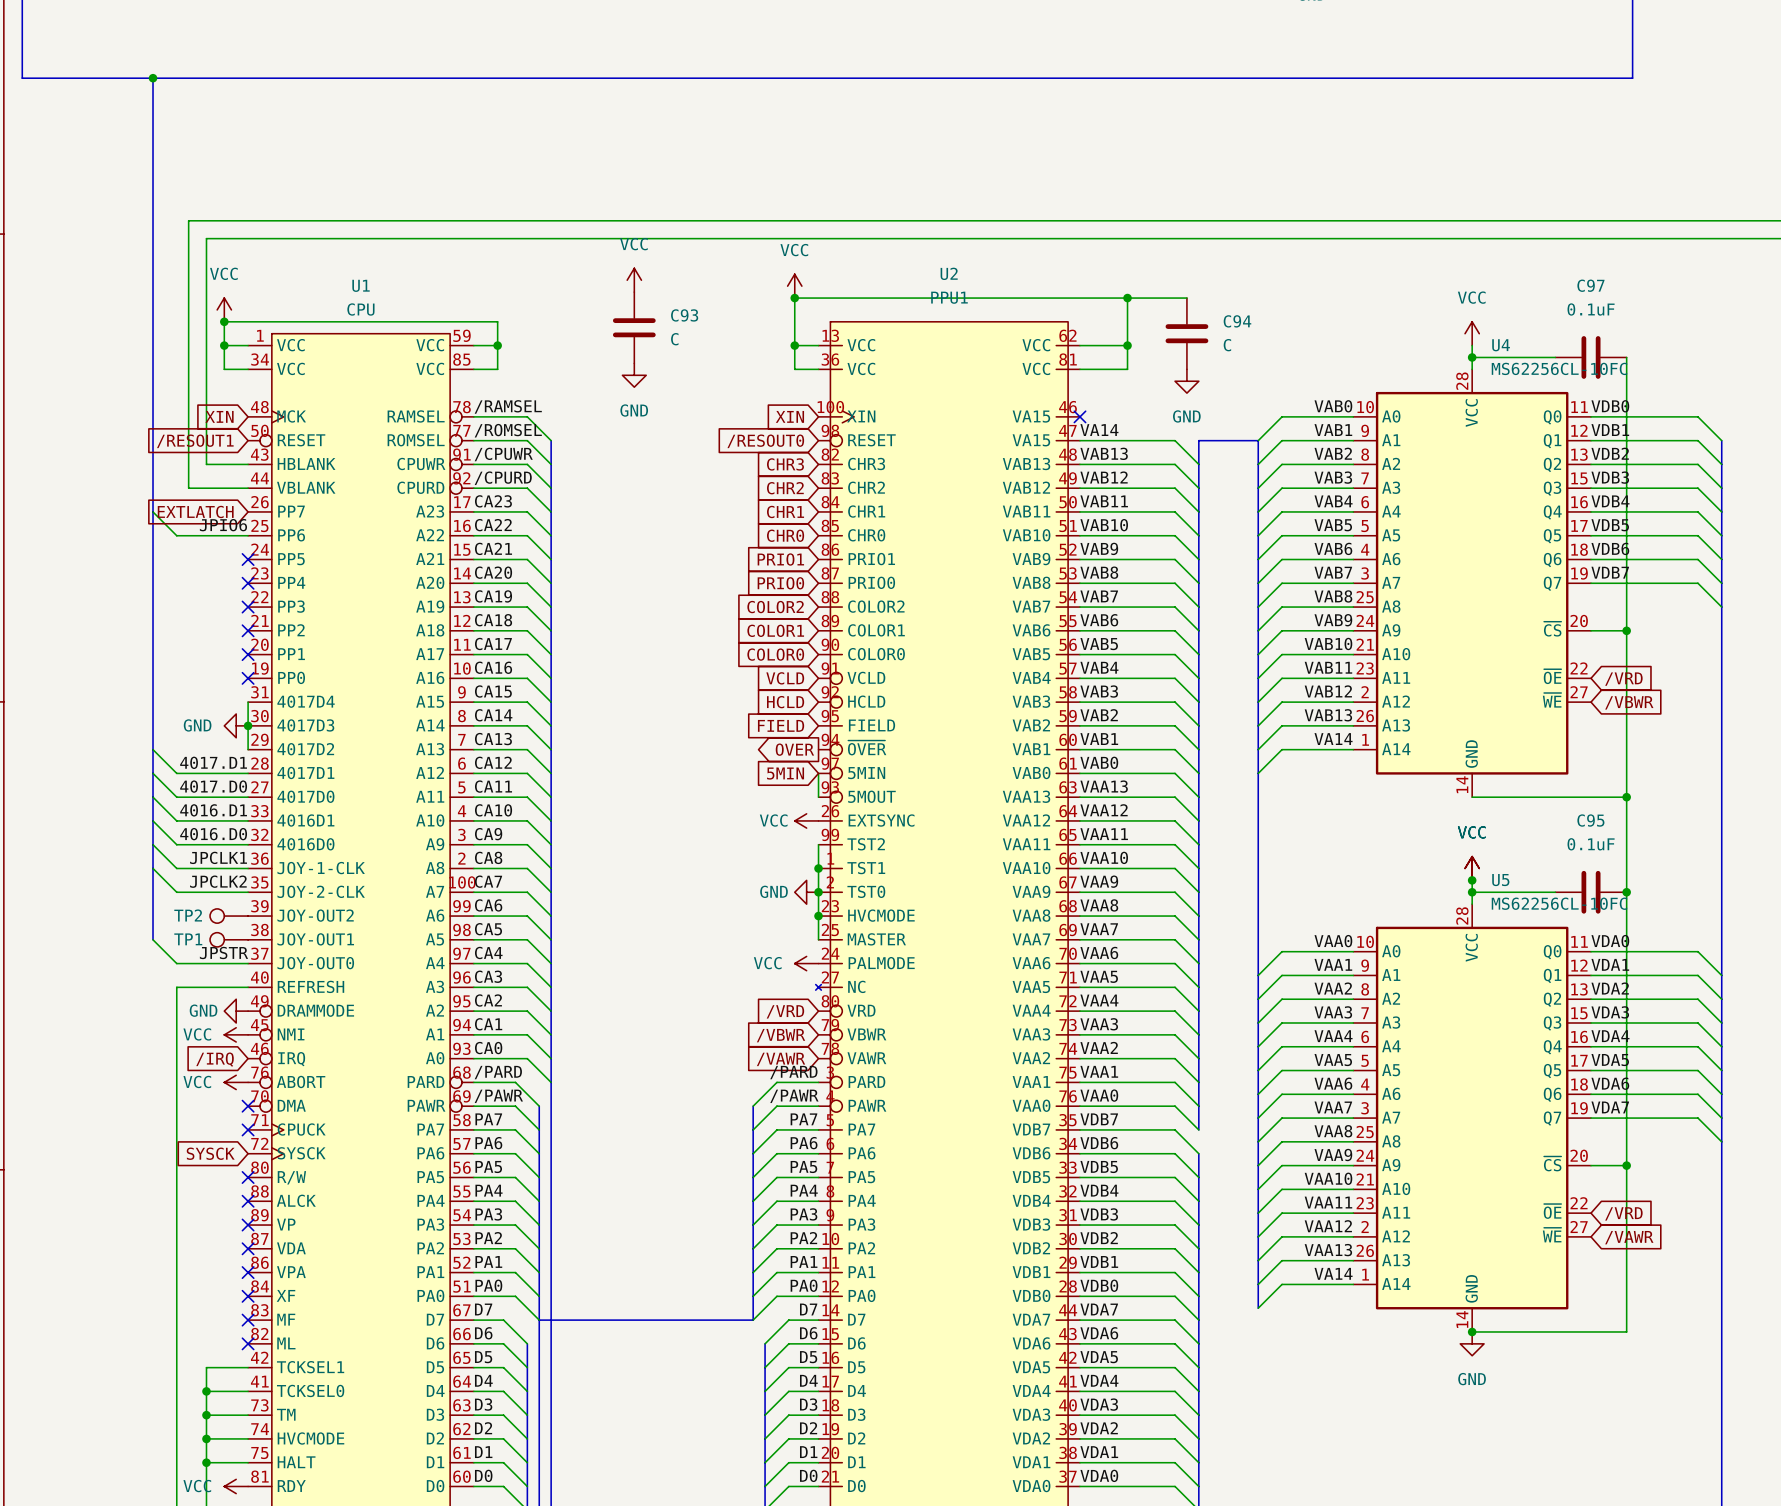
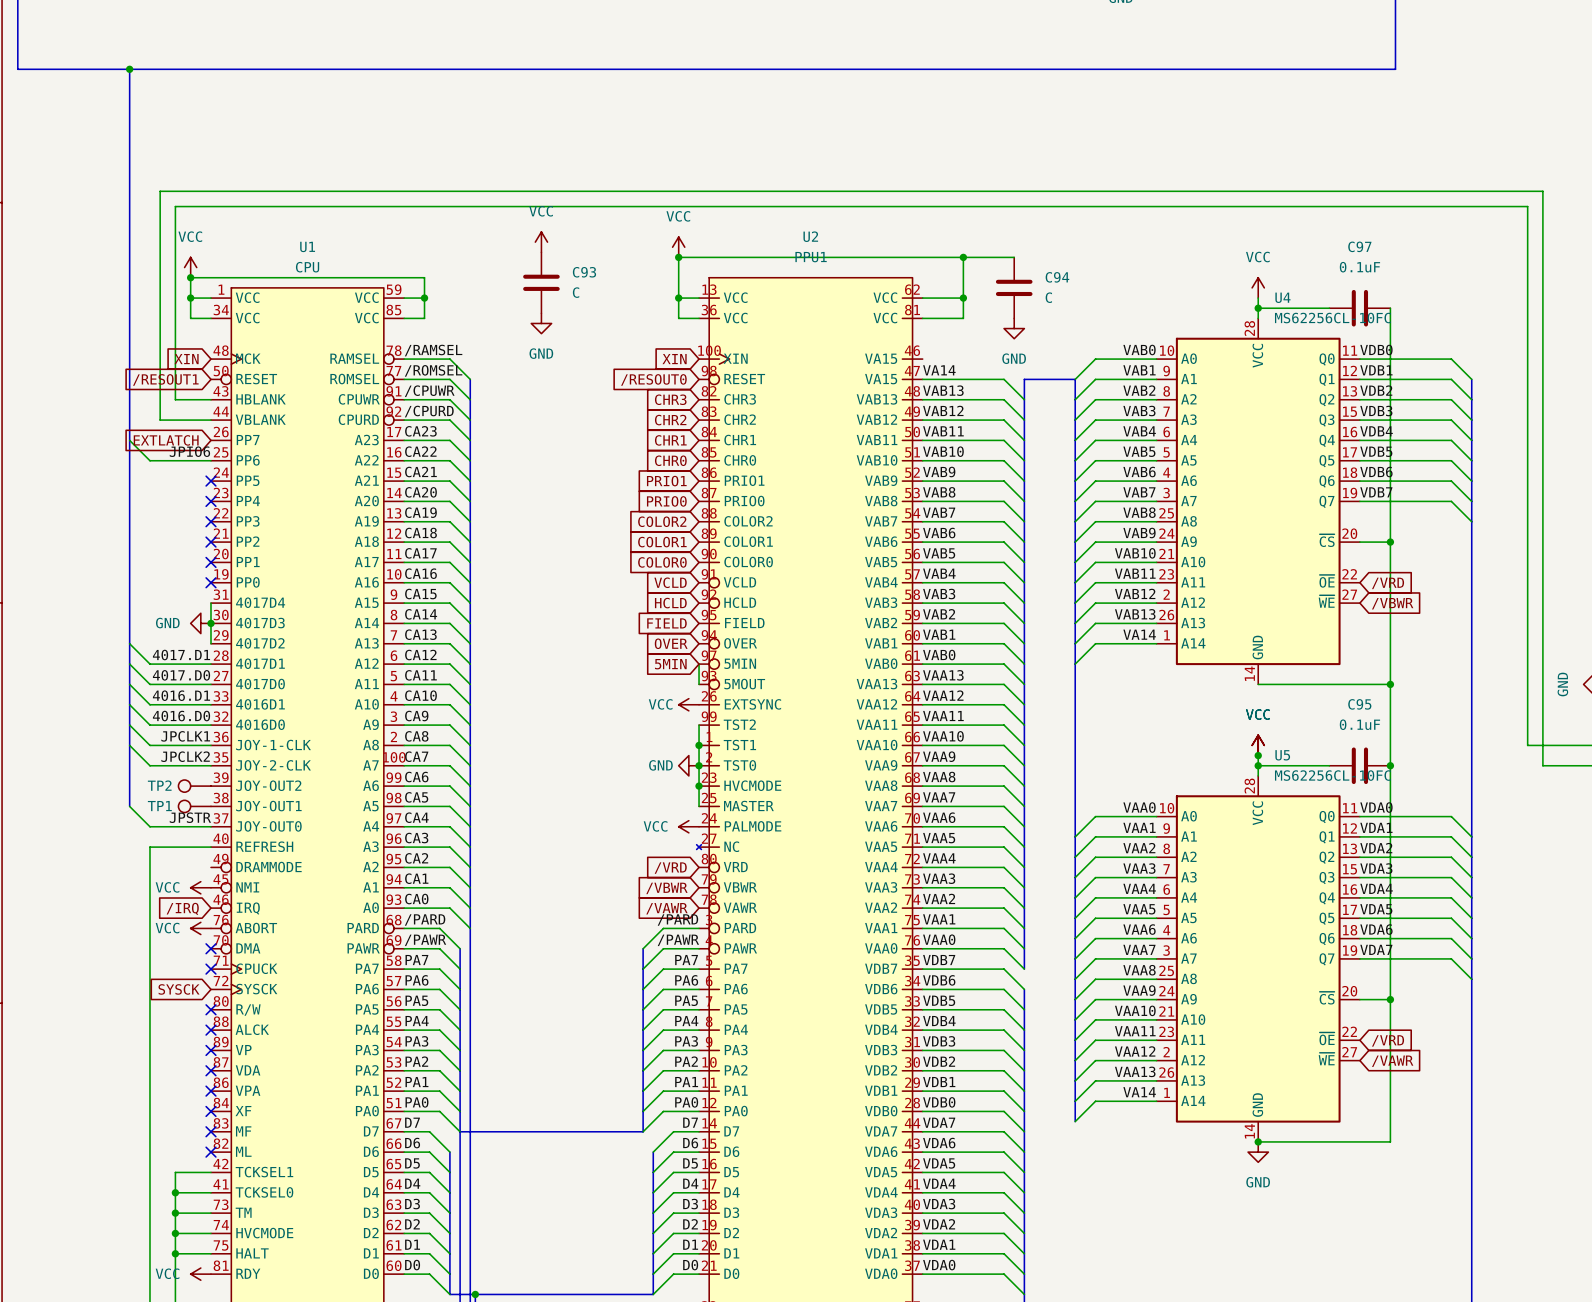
no-connect mark: (1079, 416) -> none
U2 pin name: ~{OVER} (867, 747) -> OVER (740, 643)
global label shape: output (794, 749) -> input (671, 643)
power symbol: GND (236, 1011) -> none

